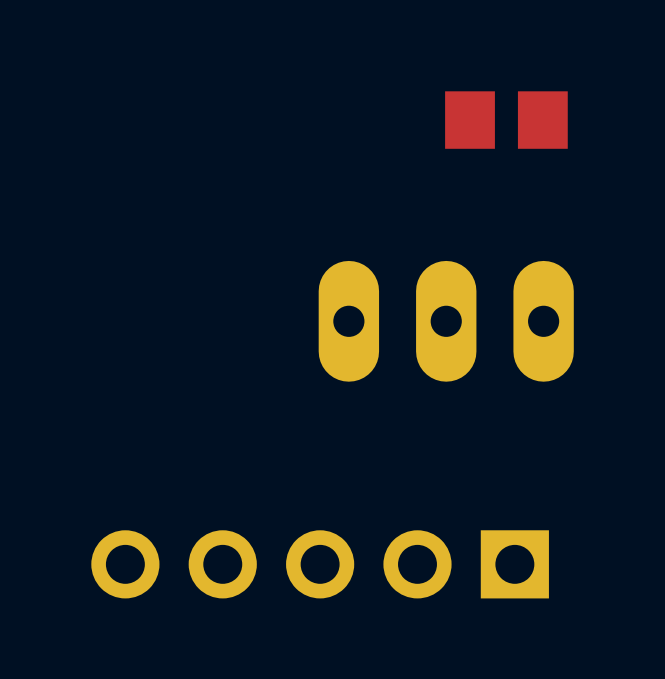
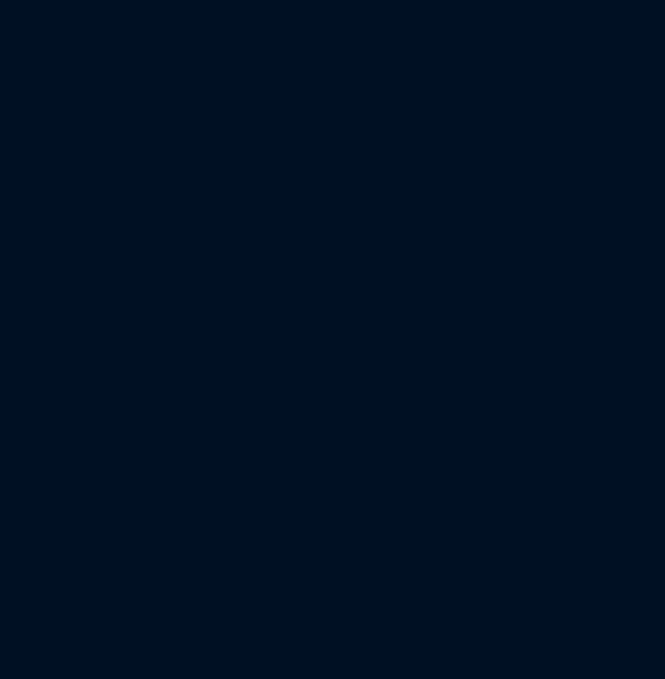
part: (506, 120) -> none
part: (446, 321) -> none
part: (320, 564) -> none

